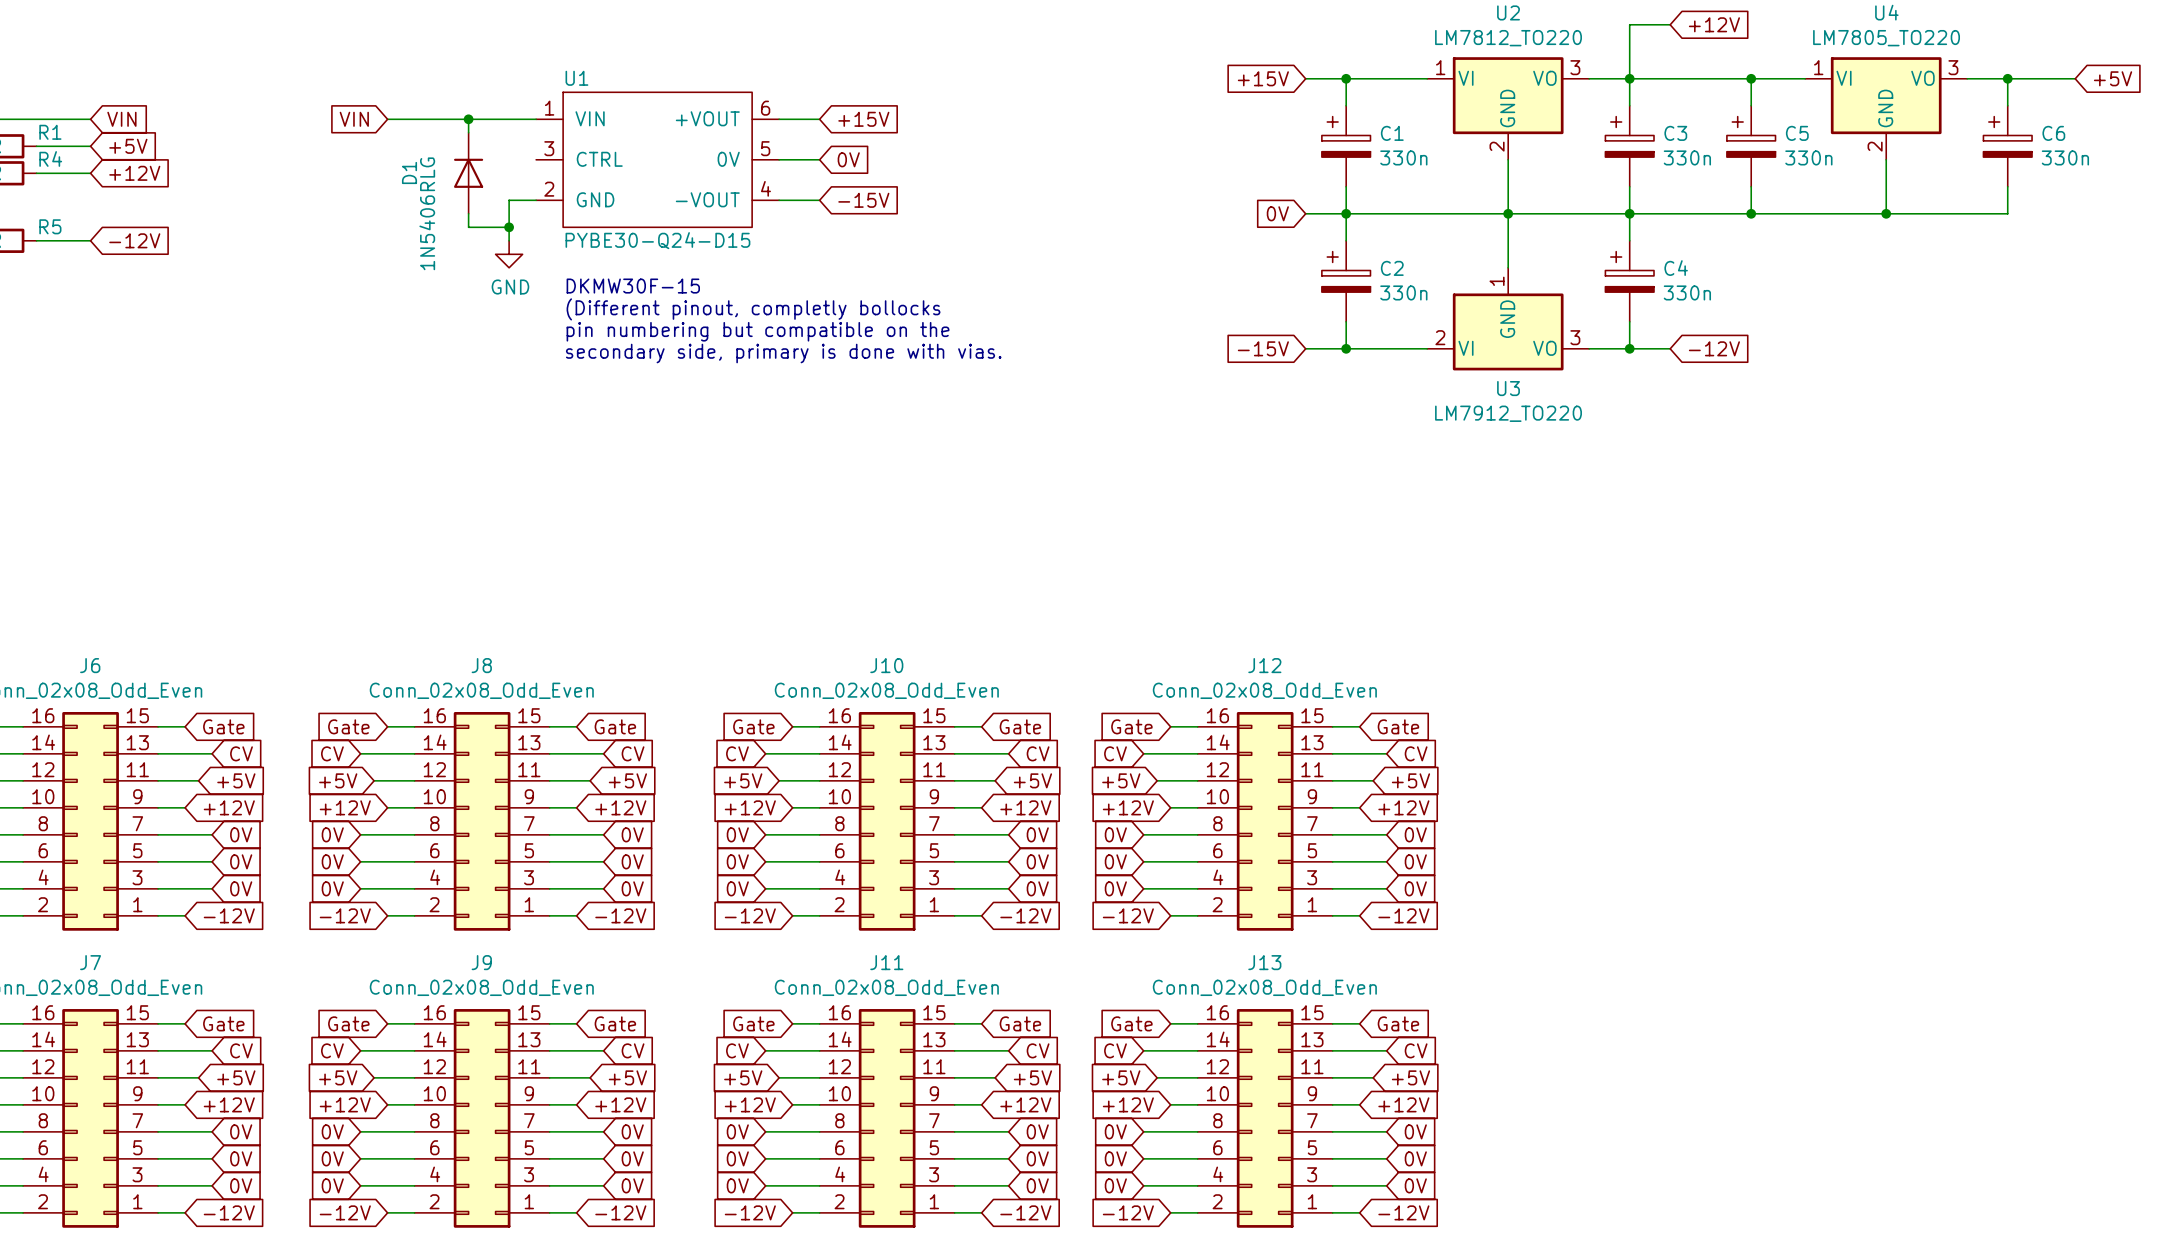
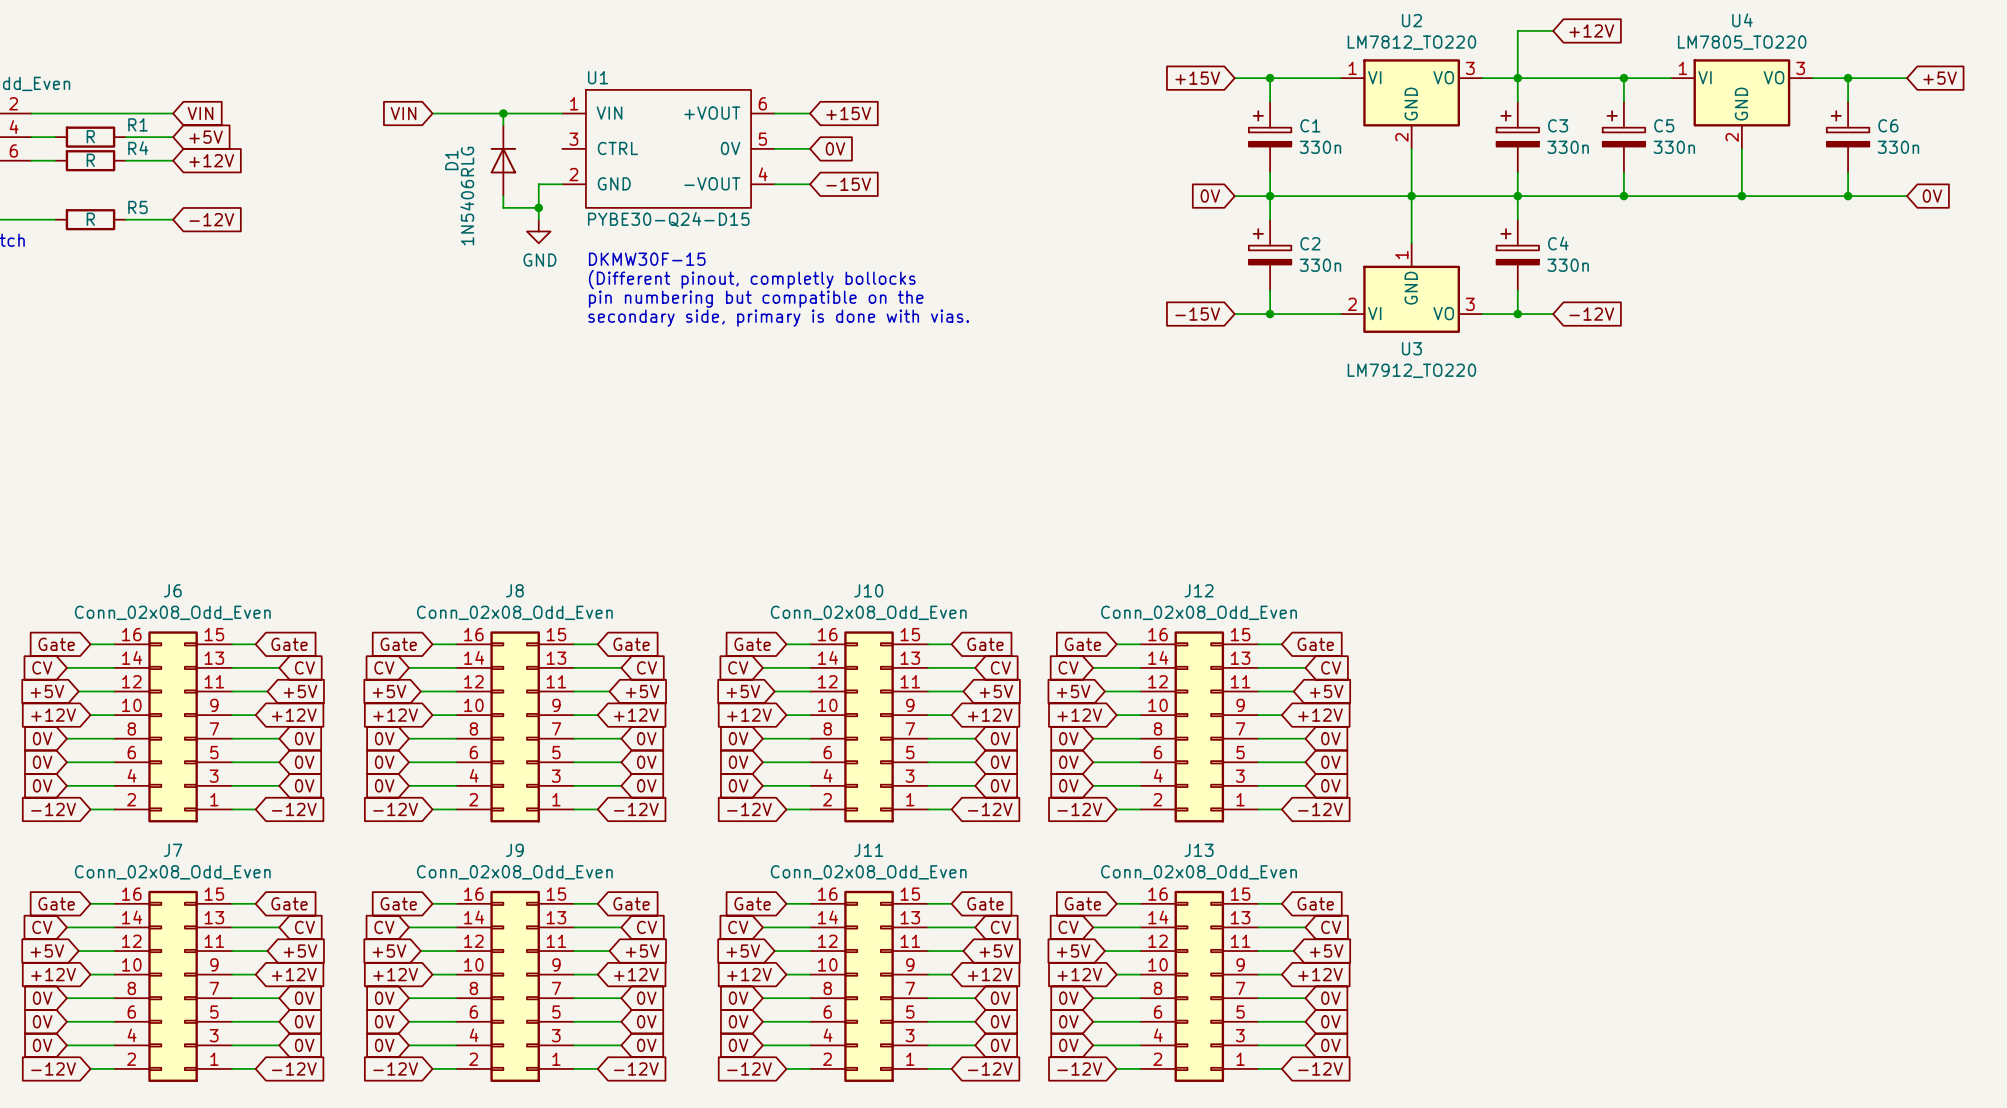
wire: none -> (1848, 196) (1907, 196)
junction: none -> (1848, 196)
global label: none -> 0V (1932, 196)

